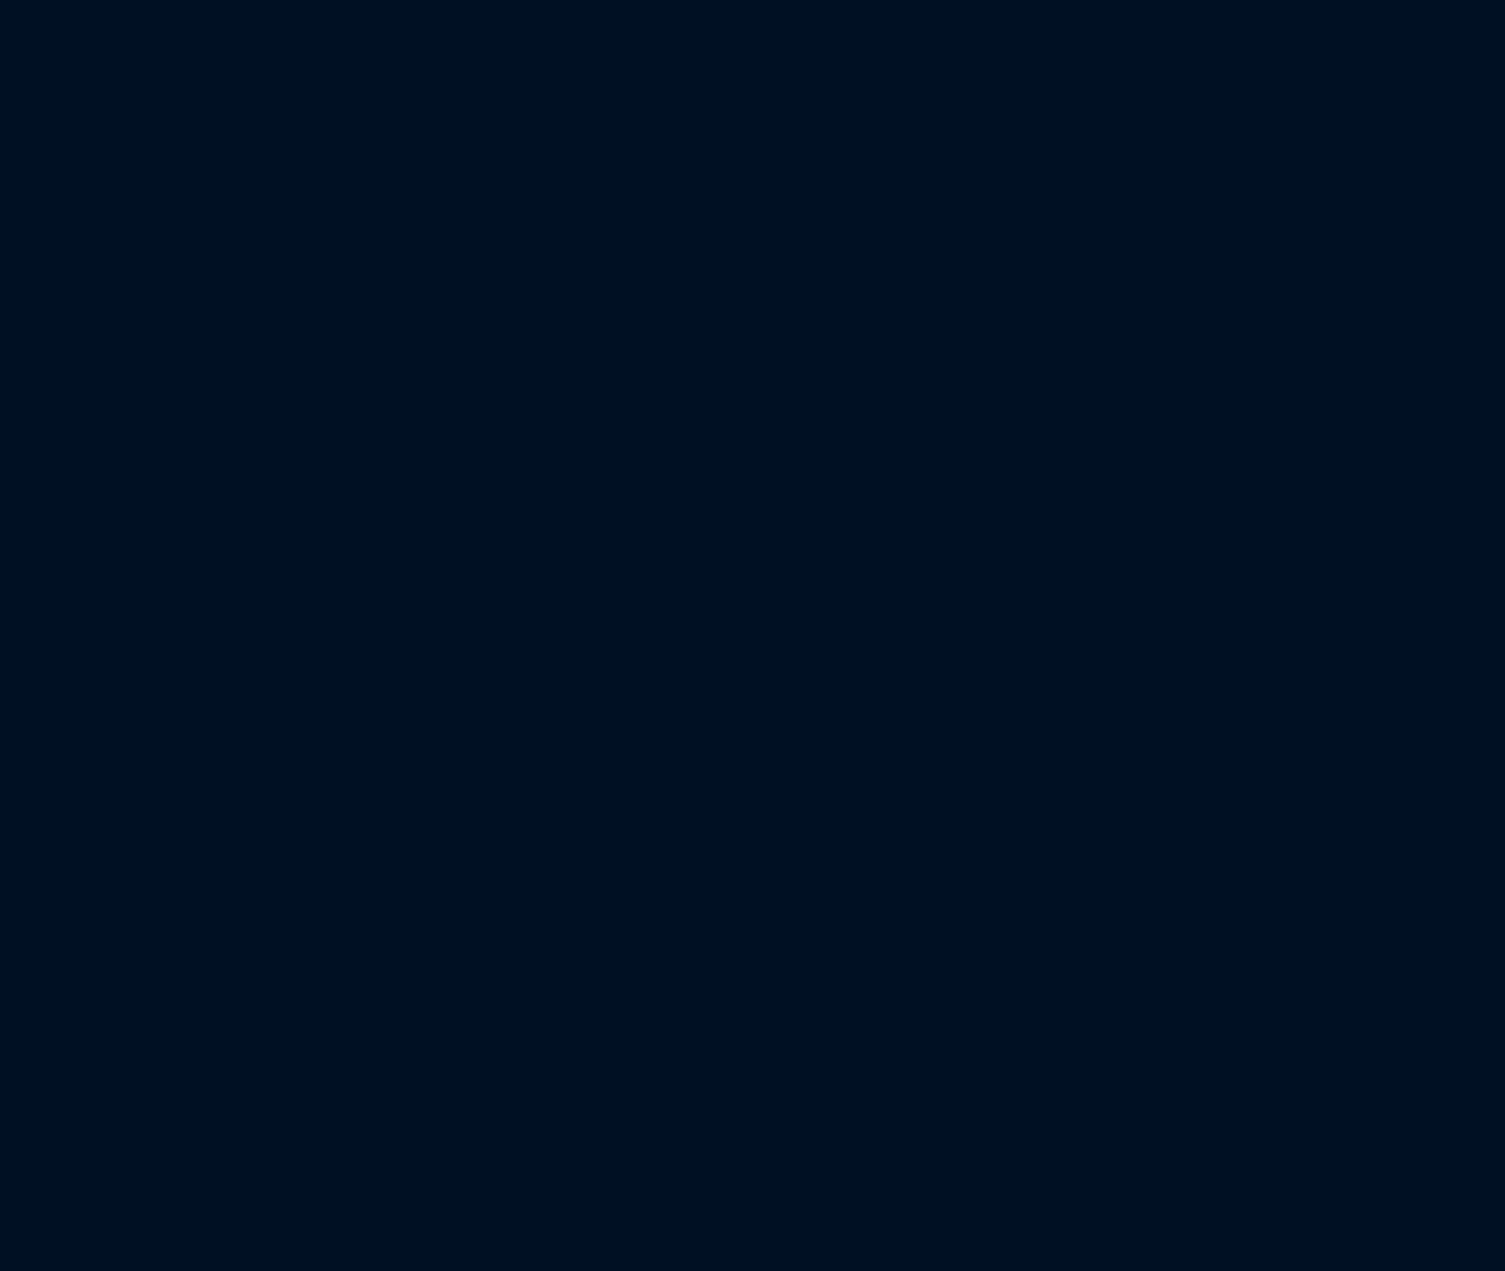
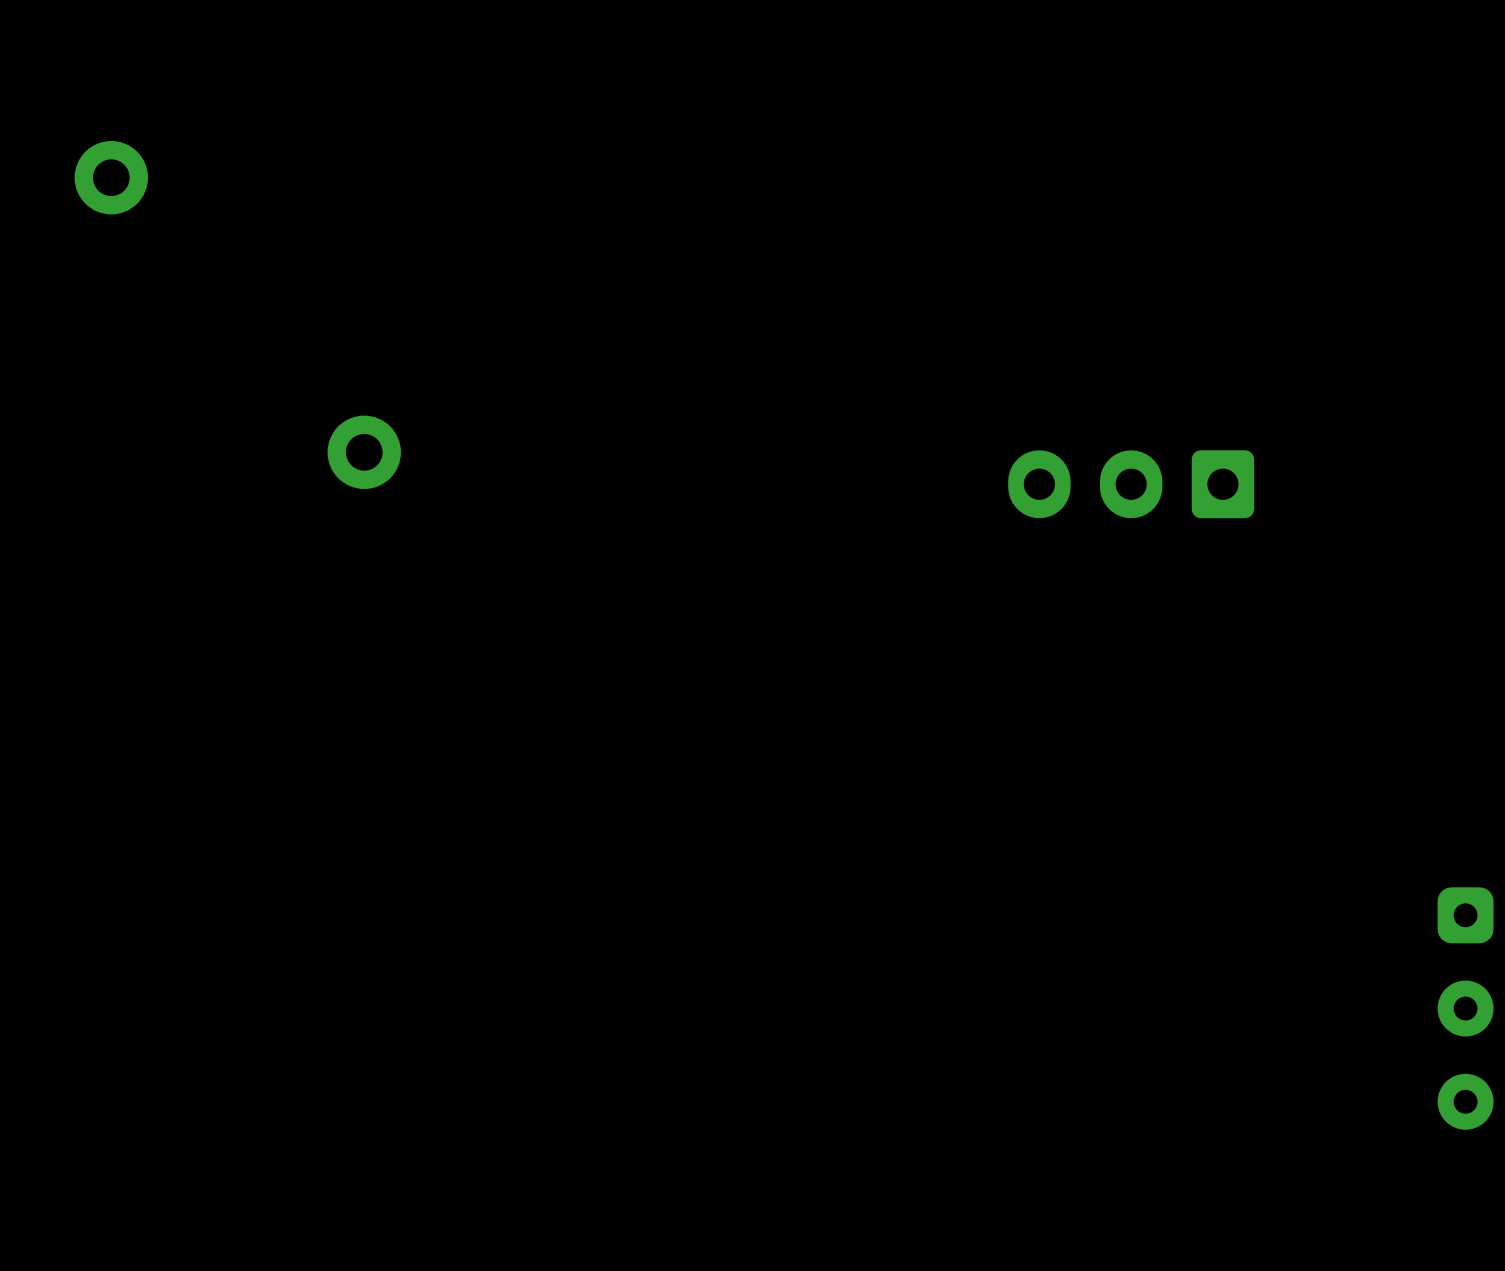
part: none -> (111, 177)
part: none -> (364, 452)
part: none -> (1131, 484)
part: none -> (1465, 1008)

